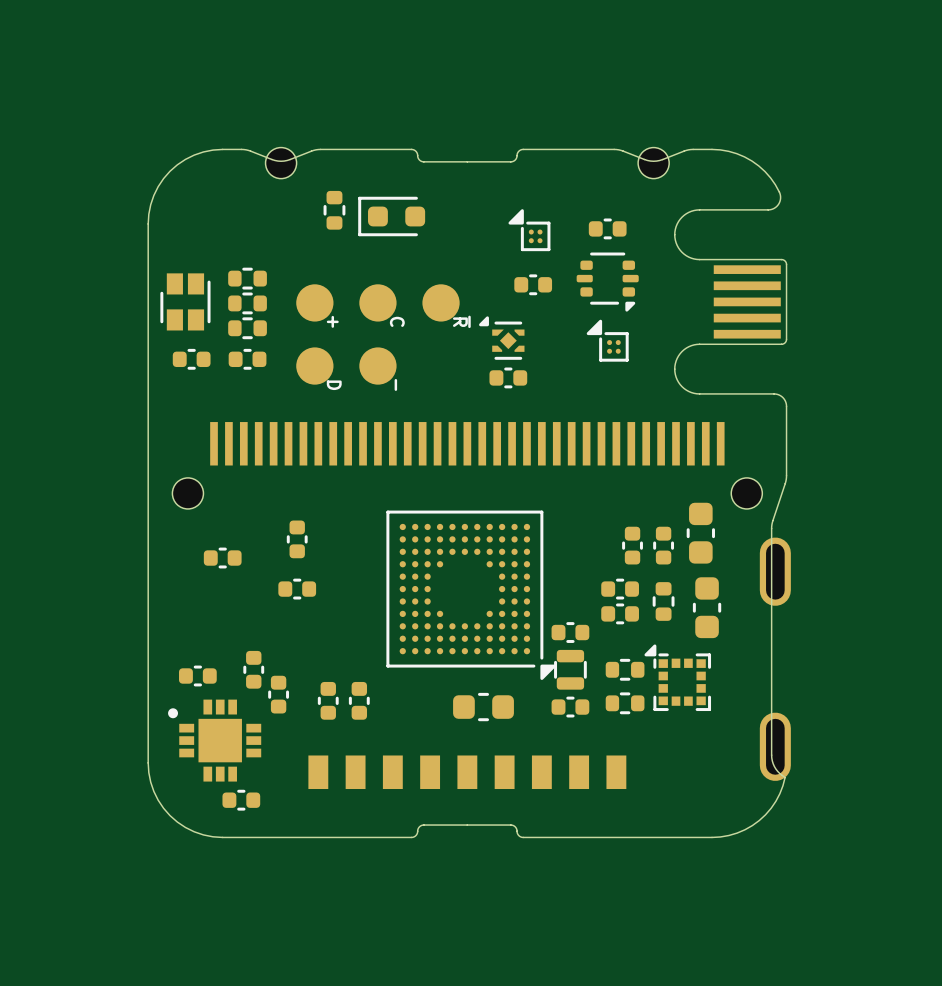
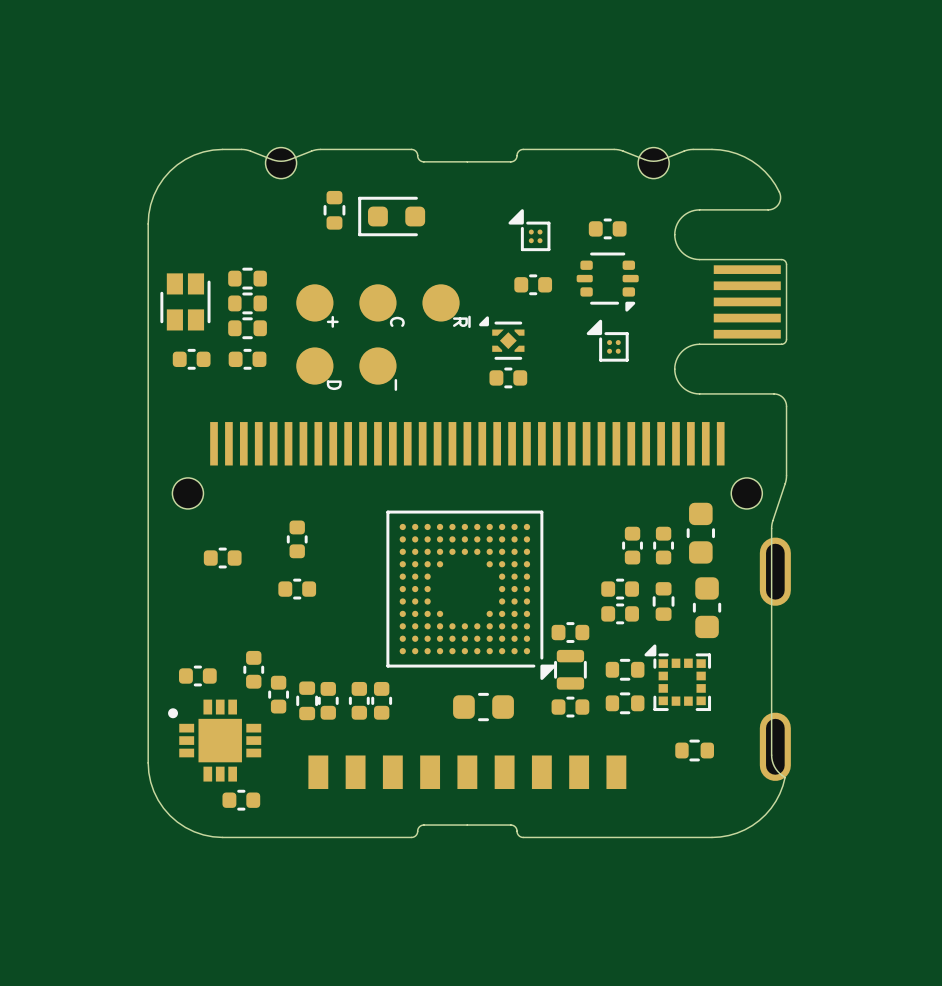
part: none -> (307, 700)
part: none -> (381, 700)
part: none -> (694, 750)

